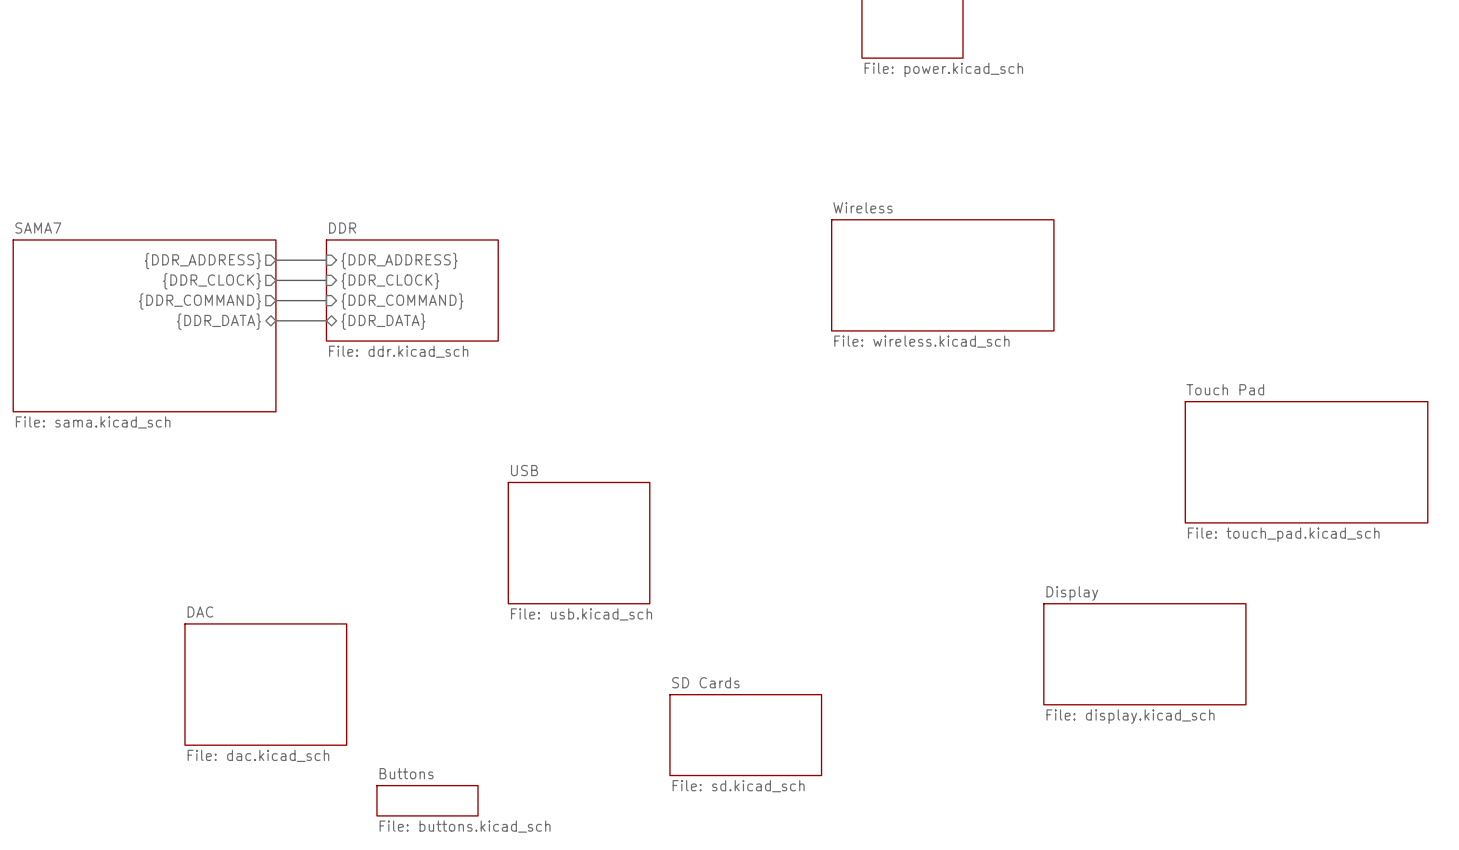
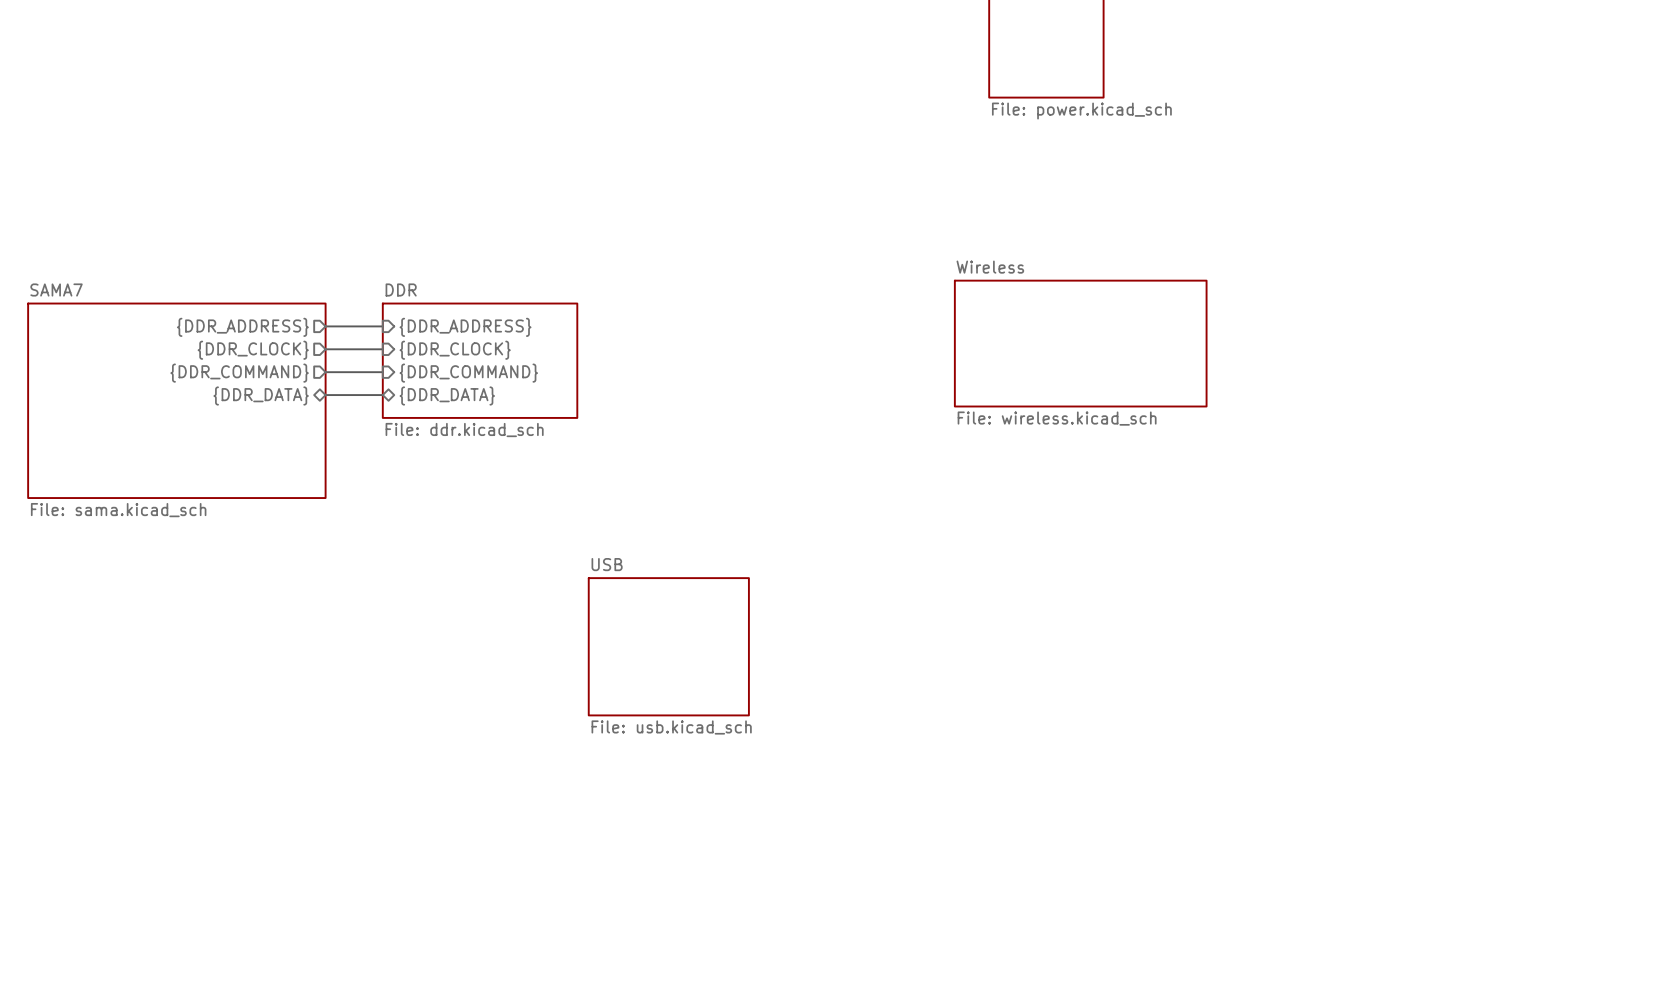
sheet Touch Pad: File: touch_pad.kicad_sch (1306, 462) -> none
sheet Display: File: display.kicad_sch (1144, 654) -> none
sheet DAC: File: dac.kicad_sch (265, 684) -> none
sheet SD Cards: File: sd.kicad_sch (745, 735) -> none
sheet Buttons: File: buttons.kicad_sch (427, 800) -> none

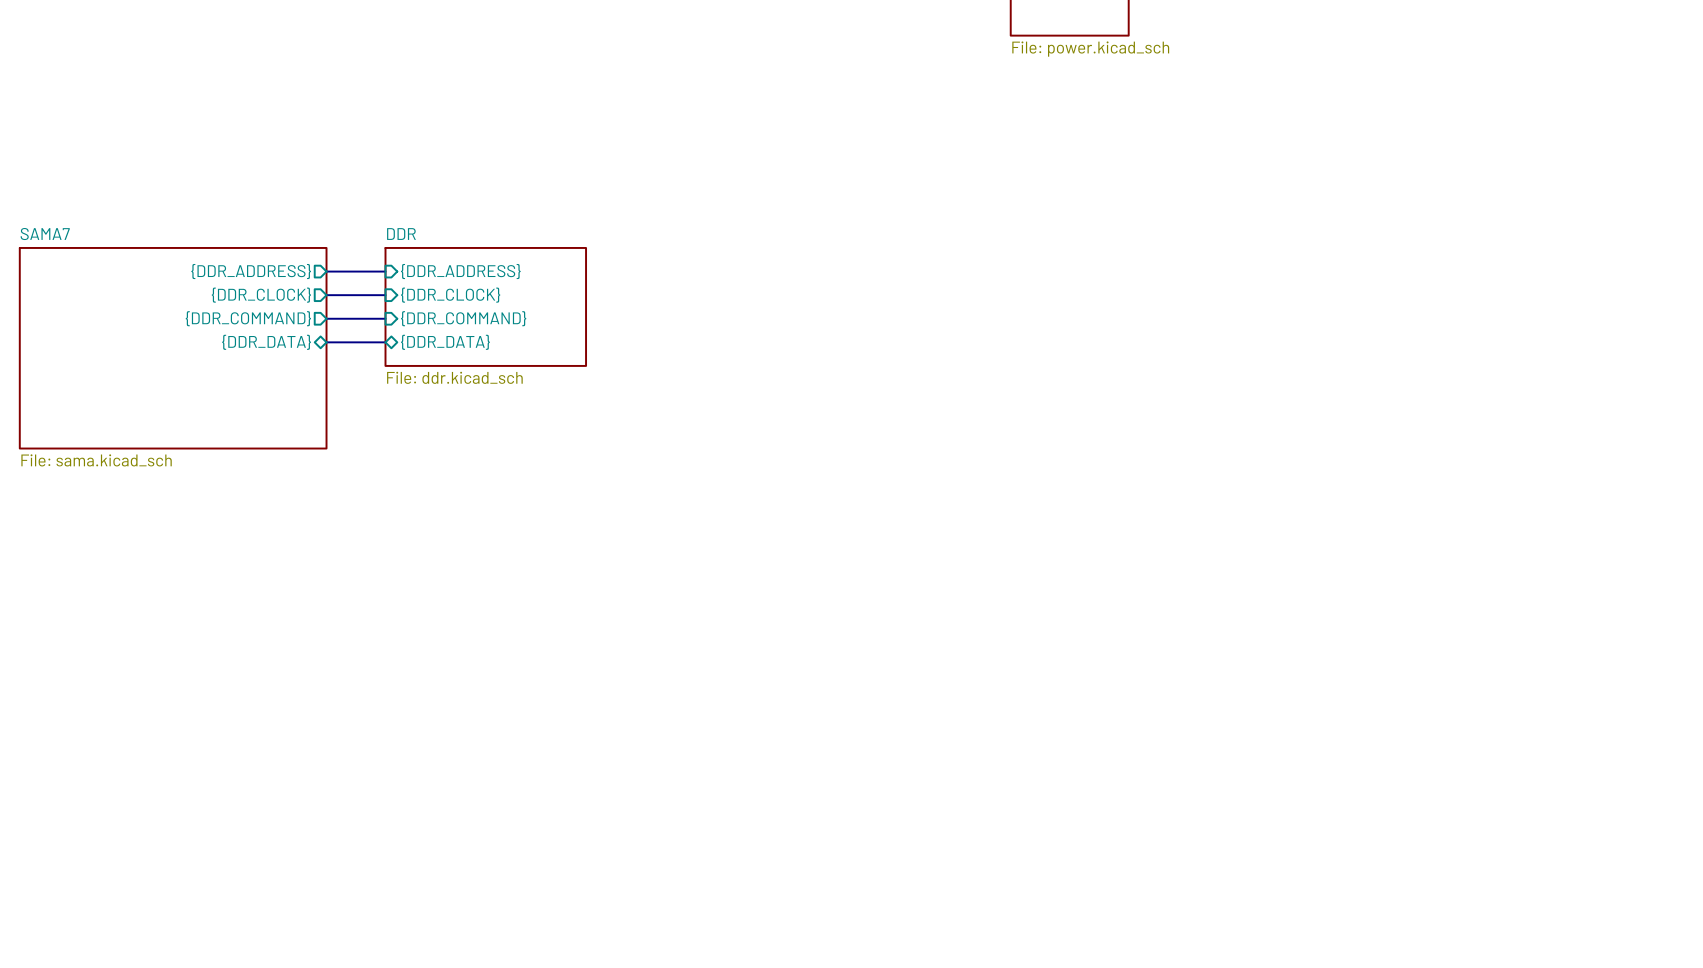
sheet Wireless: File: wireless.kicad_sch (1080, 343) -> none
sheet USB: File: usb.kicad_sch (668, 646) -> none

